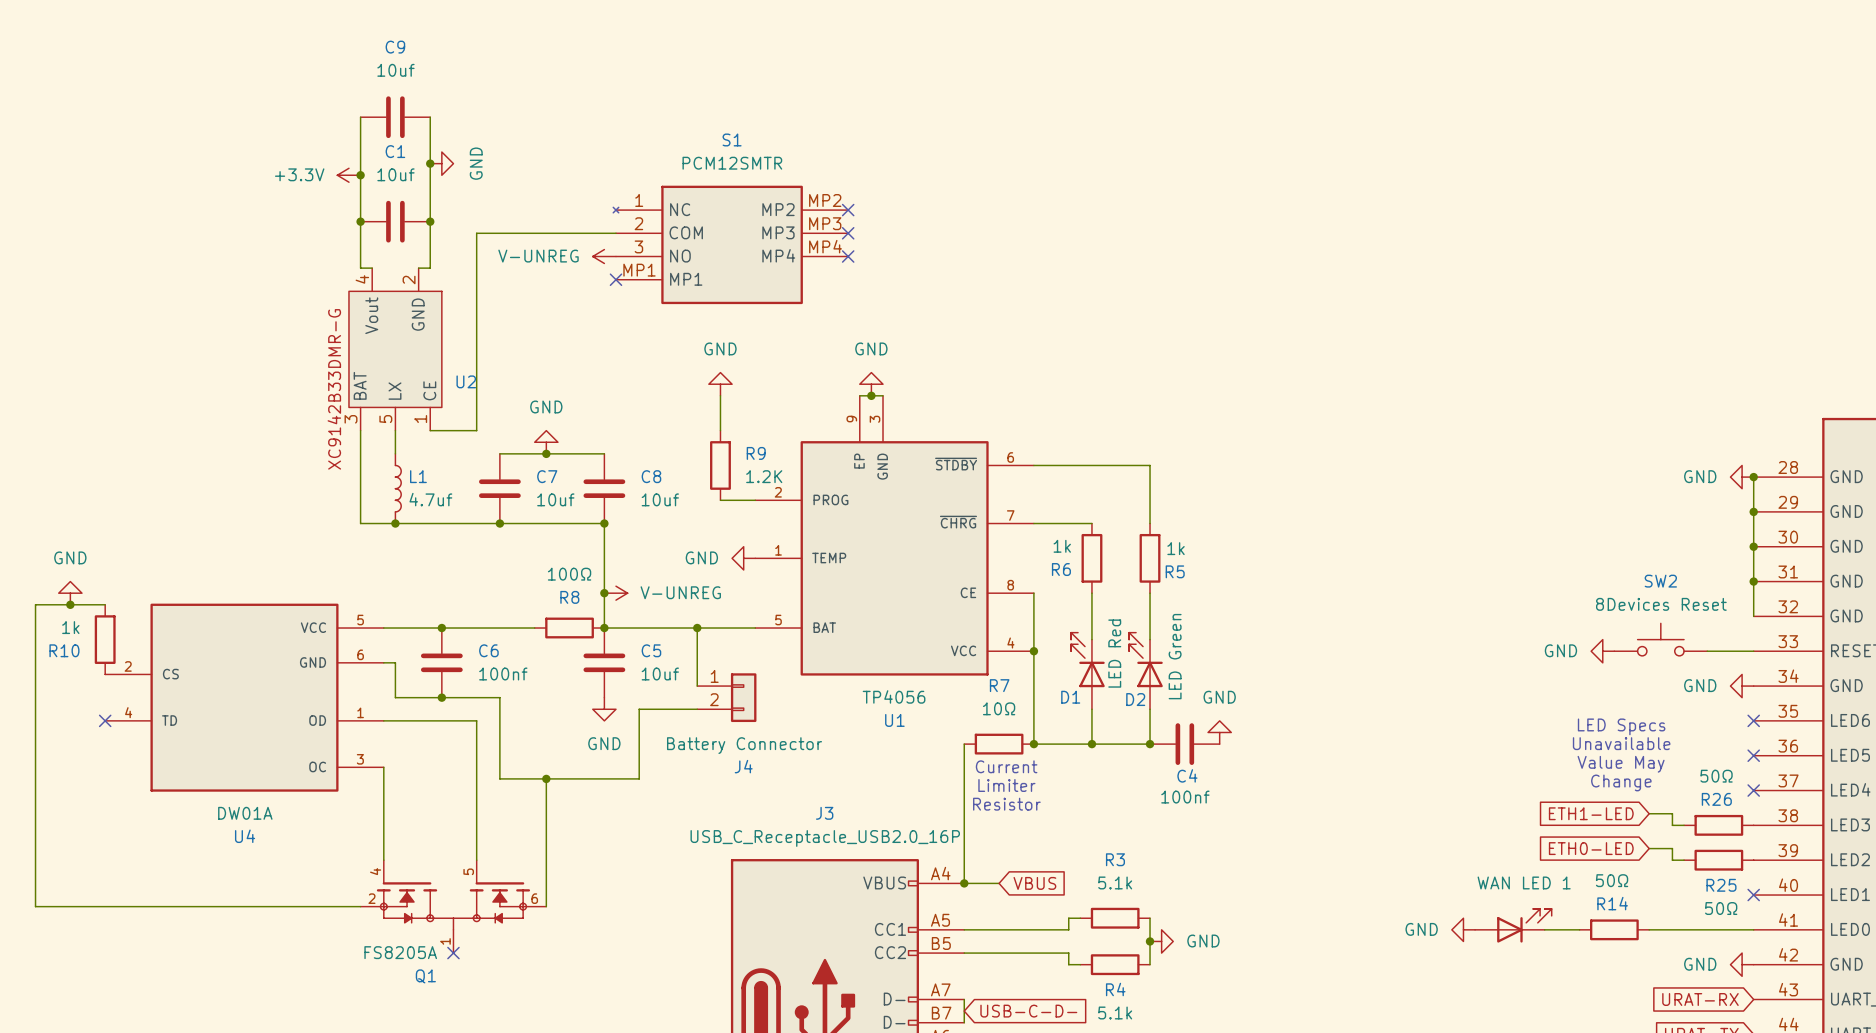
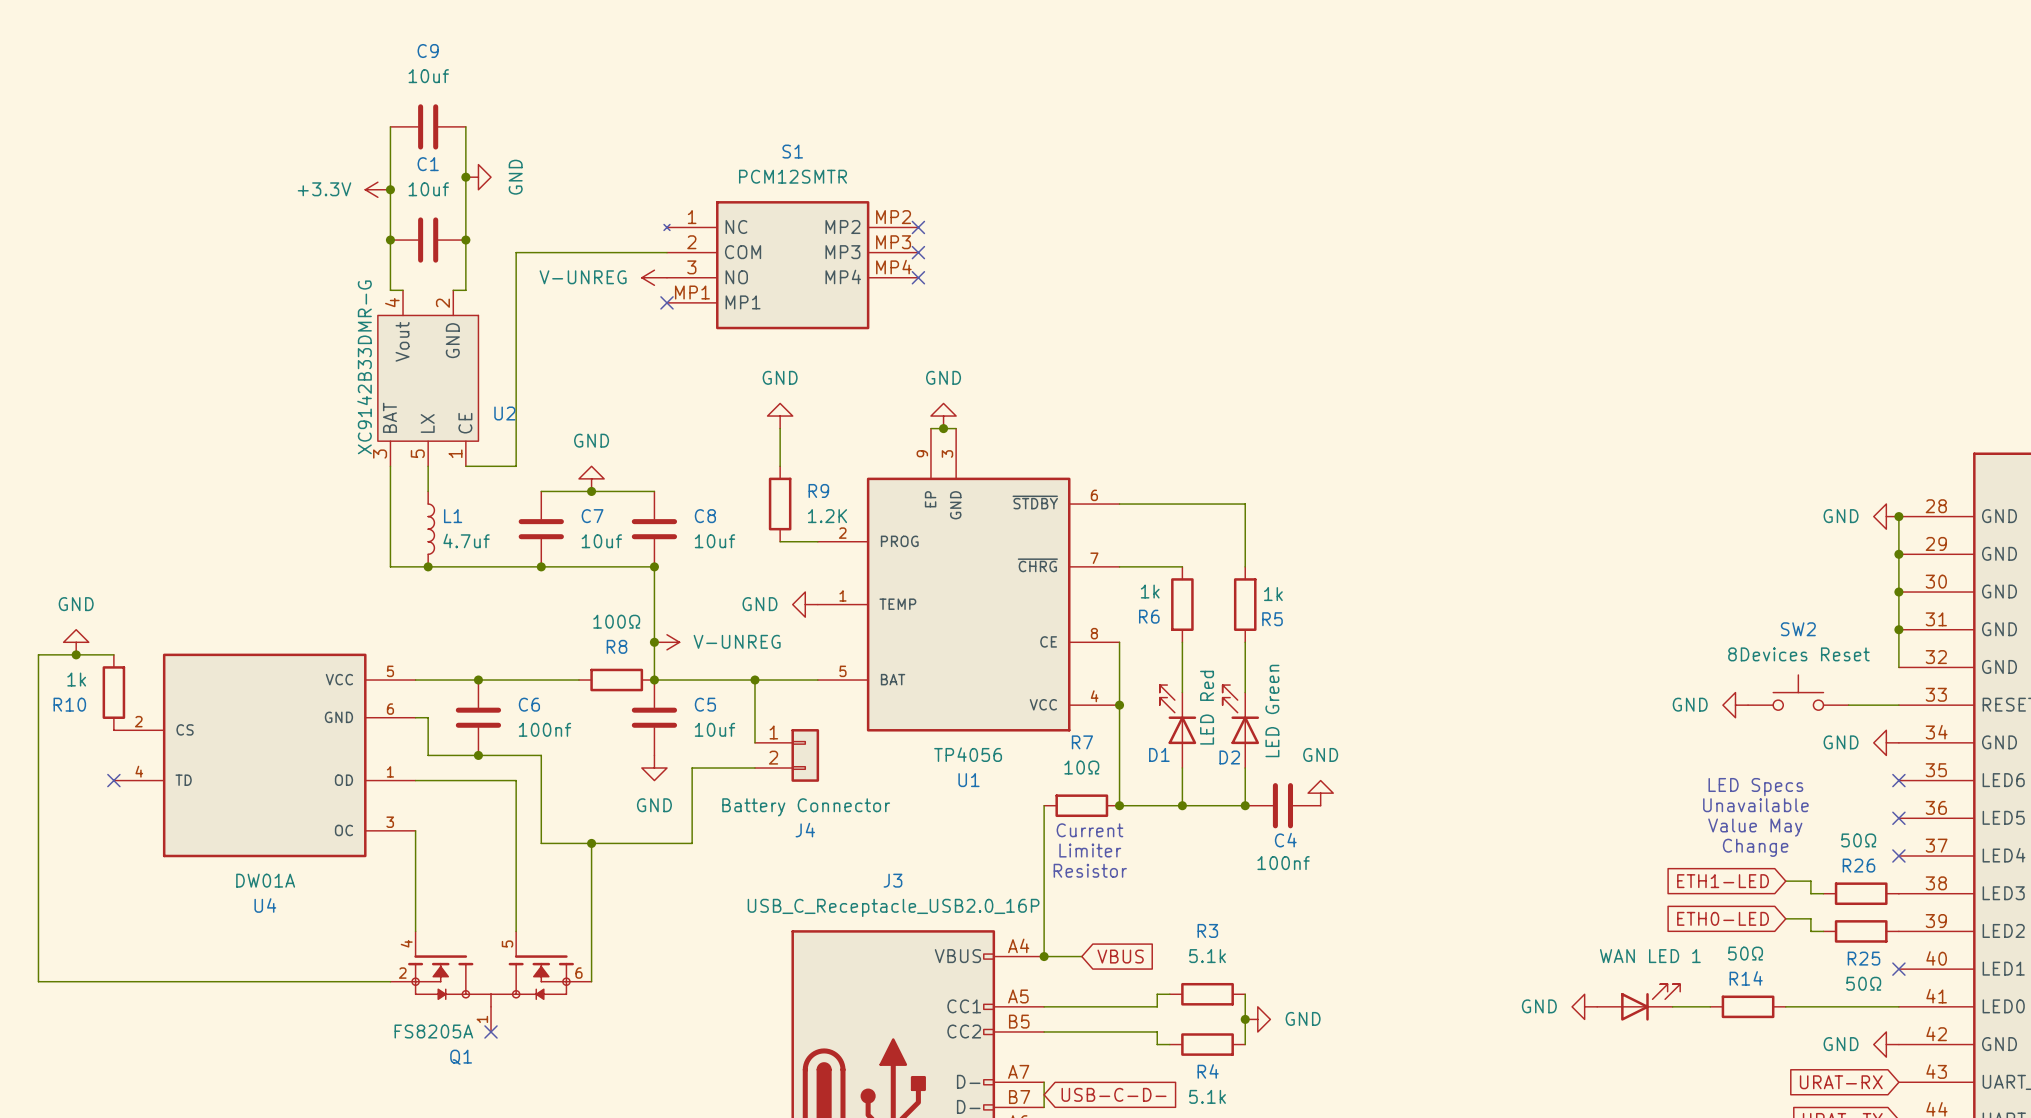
U2 value: none -> XC9142B33DMR-G (364, 367)
U2 text: XC9142B33DMR-G (334, 389) -> none

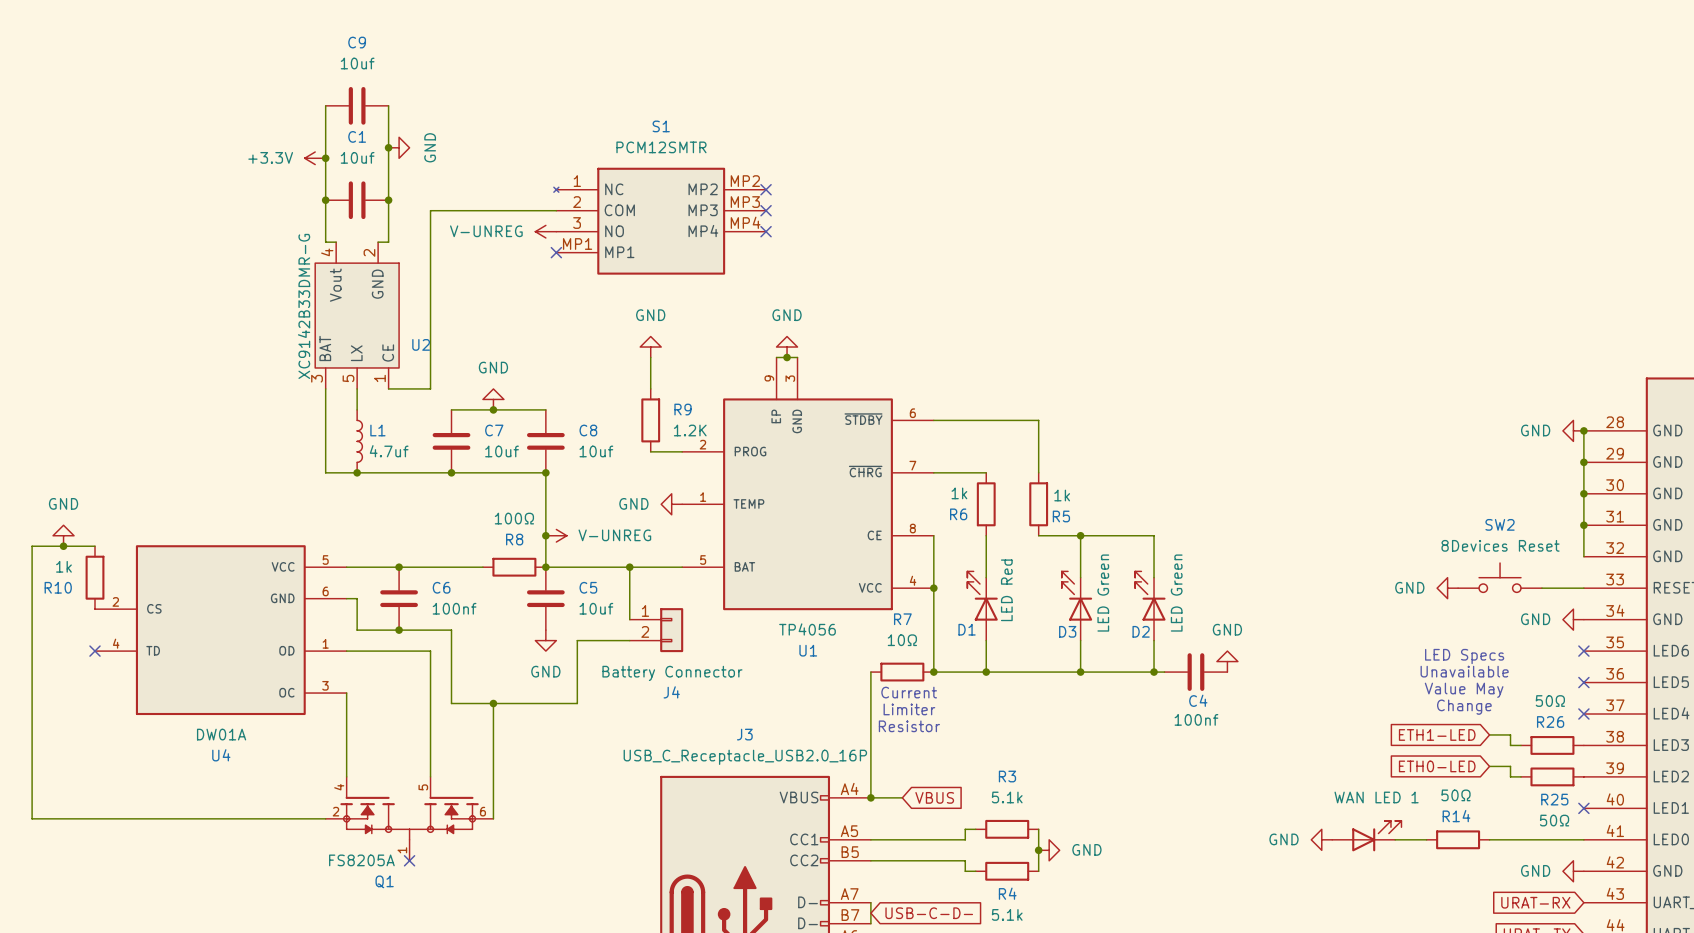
wire: (1245, 642) (1245, 692) -> (1038, 535) (1154, 535) (1154, 577)
wire: none -> (1080, 535) (1080, 577)
junction: none -> (1080, 535)
D2 position: (1240, 726) -> (1150, 606)
D3: none -> LED Green (1076, 606)
wire: (1245, 768) (1245, 805) -> (1164, 672) (1038, 672)
wire: none -> (1080, 640) (1080, 672)
wire: none -> (1154, 640) (1154, 672)
power symbol position: GND (1320, 793) -> GND (1227, 661)
junction position: (1245, 805) -> (1080, 672)
C4 position: (1282, 805) -> (1195, 672)
junction: none -> (1154, 672)

